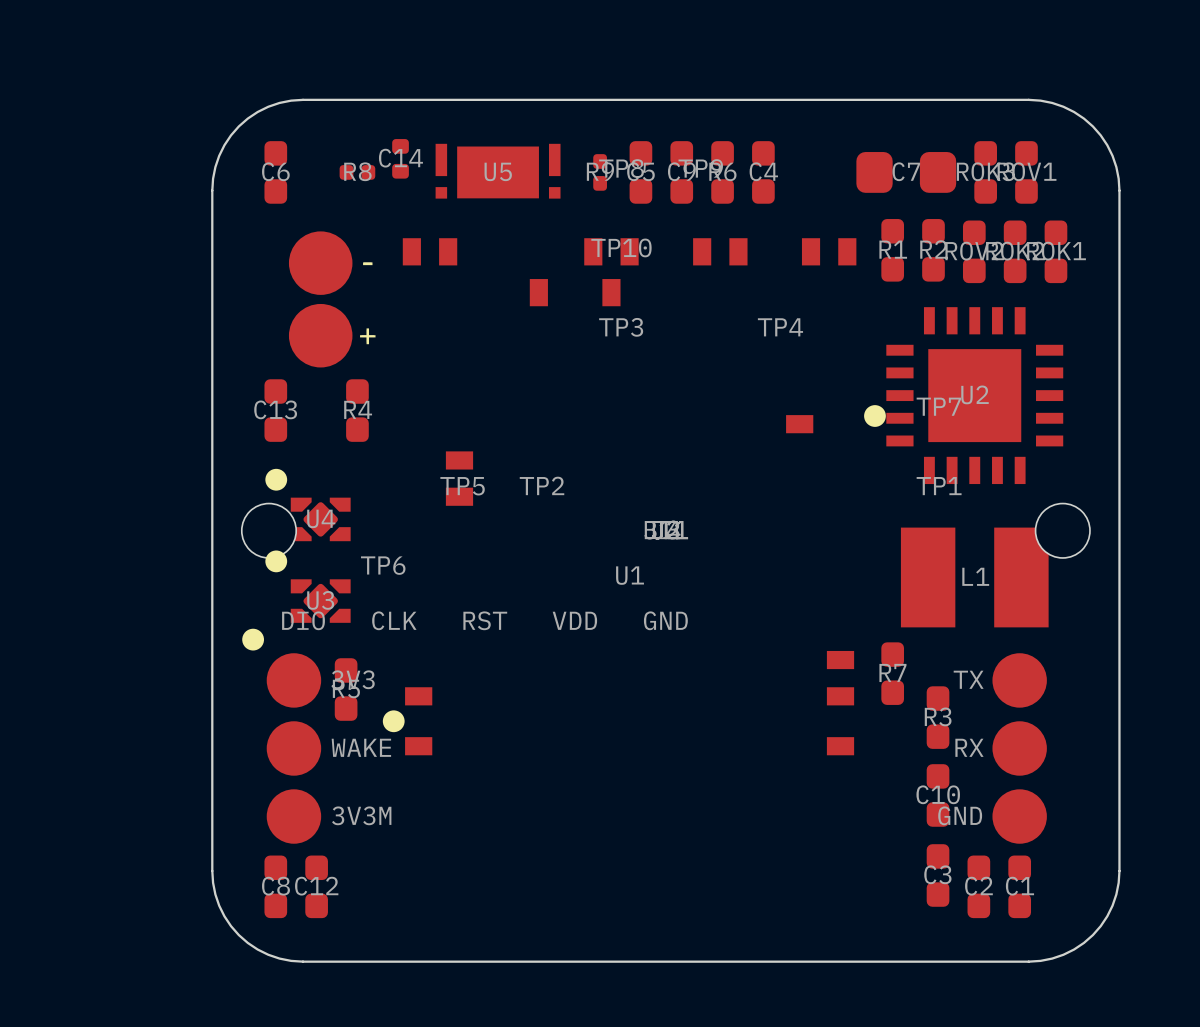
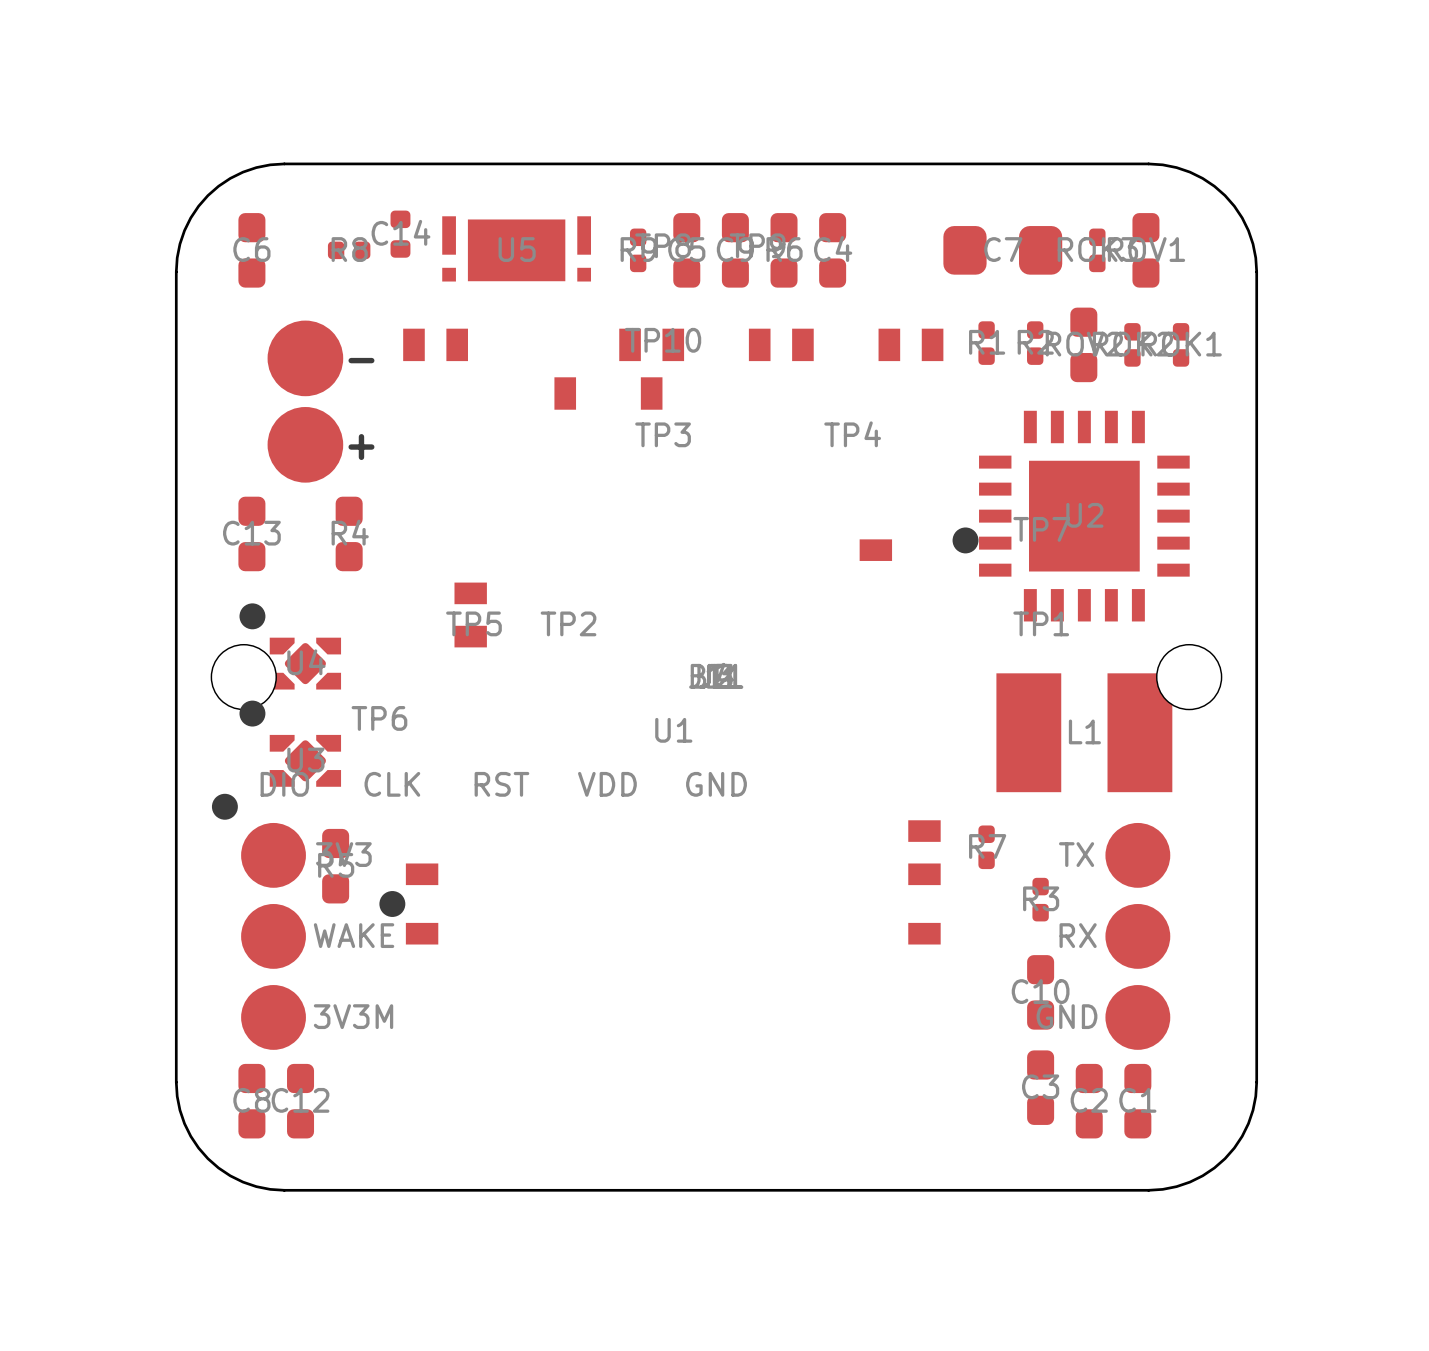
part footprint: [974, 141, 997, 204] -> [1089, 228, 1106, 273]
part footprint: [881, 219, 905, 282] -> [978, 321, 995, 365]
part footprint: [922, 219, 945, 282] -> [1027, 321, 1044, 365]
part footprint: [1003, 220, 1027, 284] -> [1124, 323, 1141, 367]
part footprint: [1044, 220, 1068, 284] -> [1172, 323, 1190, 367]
part footprint: [881, 642, 905, 705] -> [978, 825, 995, 870]
part footprint: [926, 686, 950, 749] -> [1032, 877, 1049, 922]

